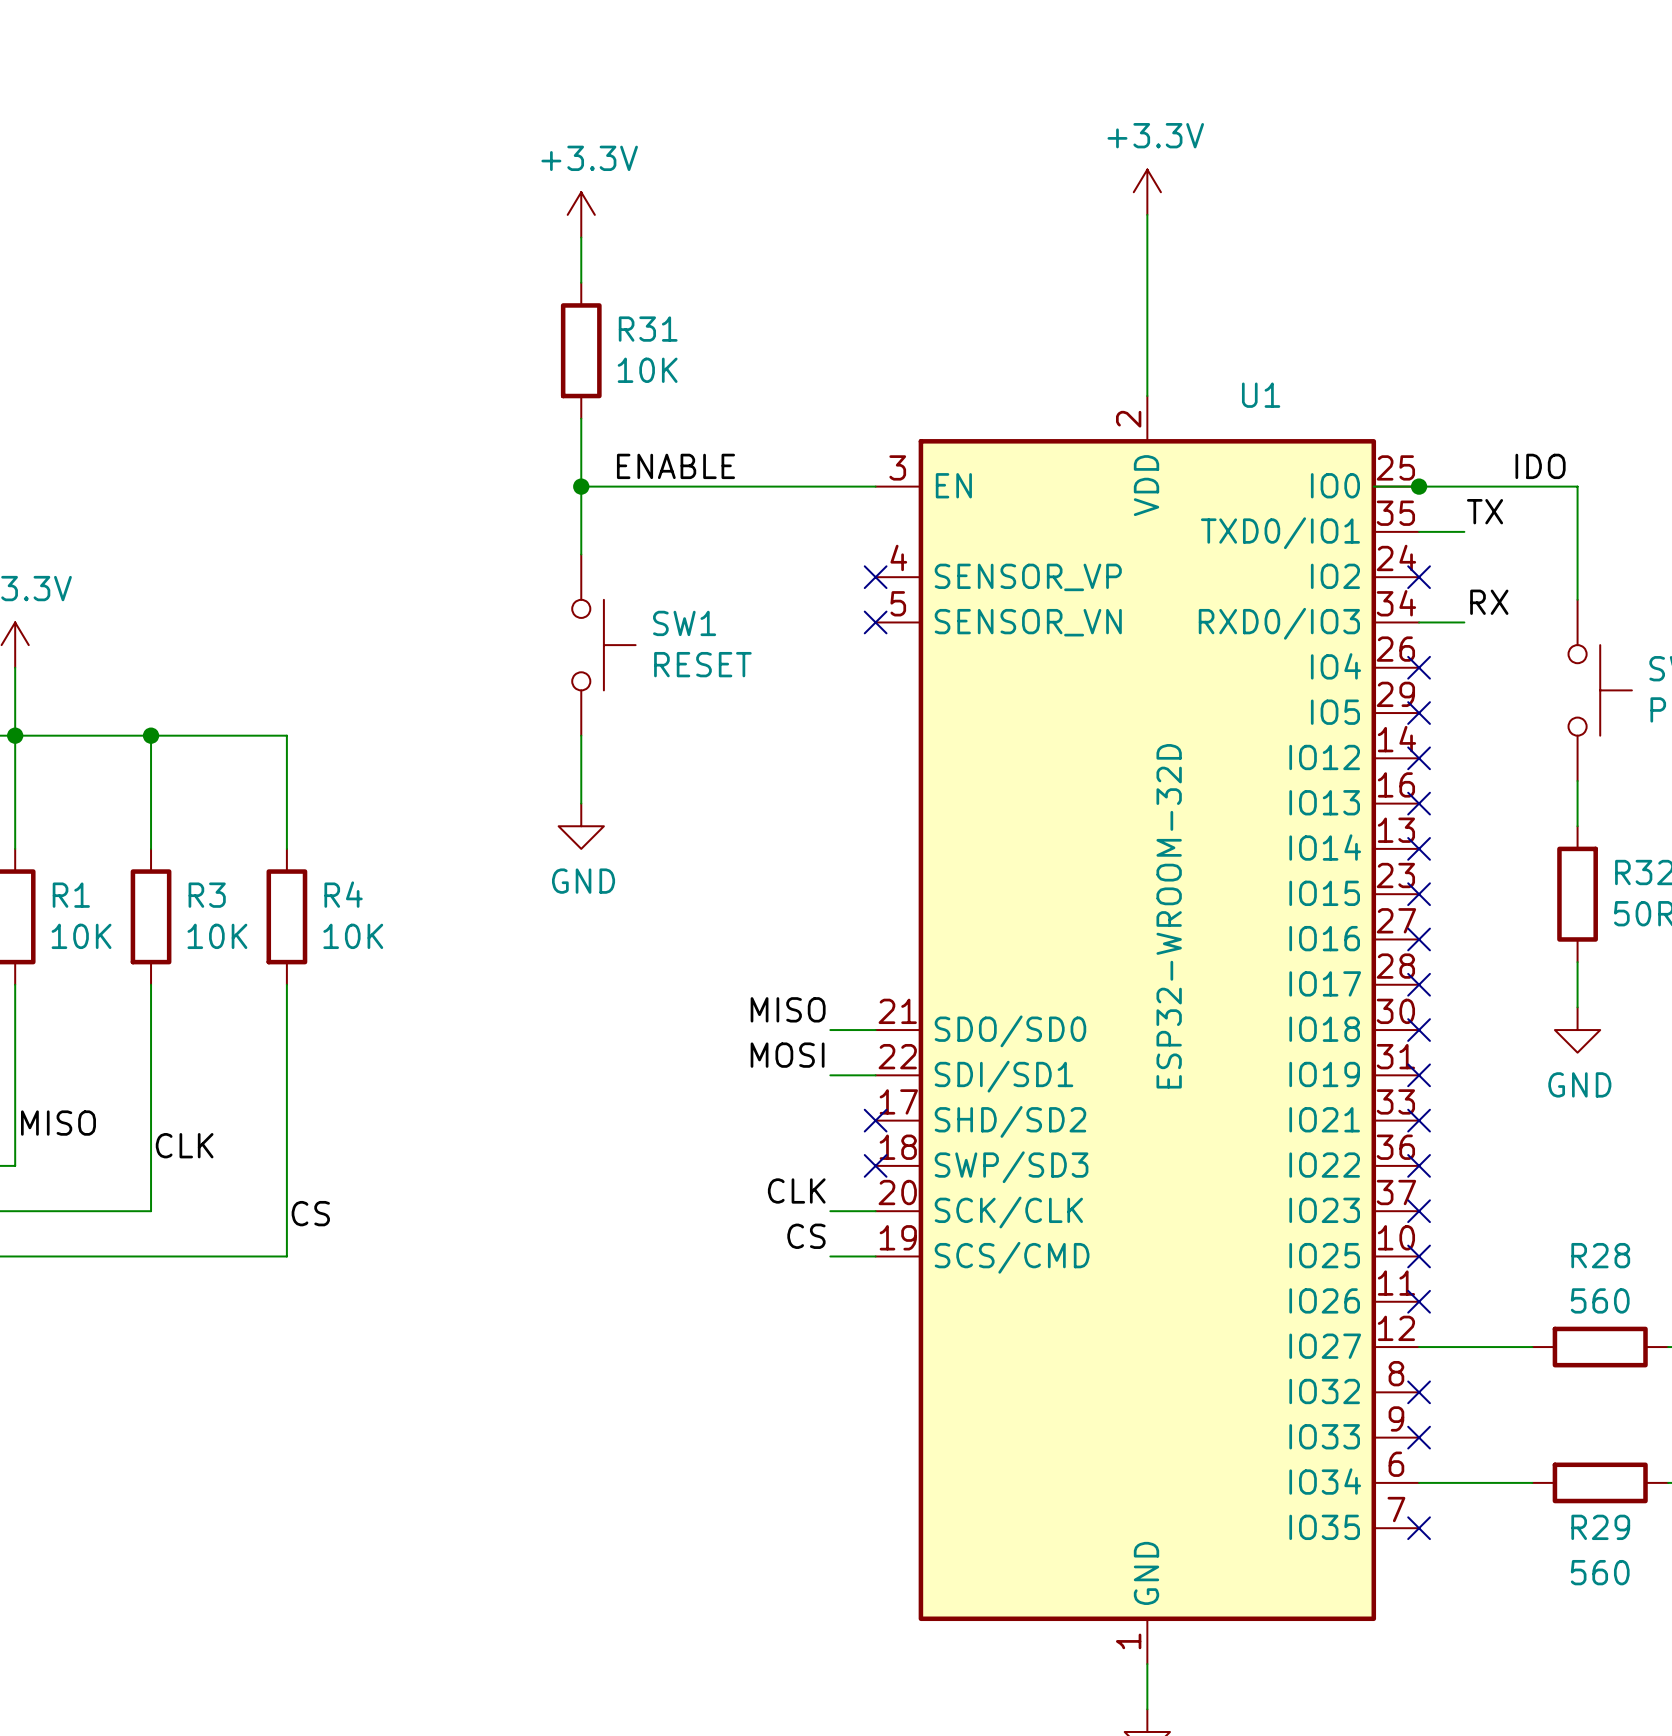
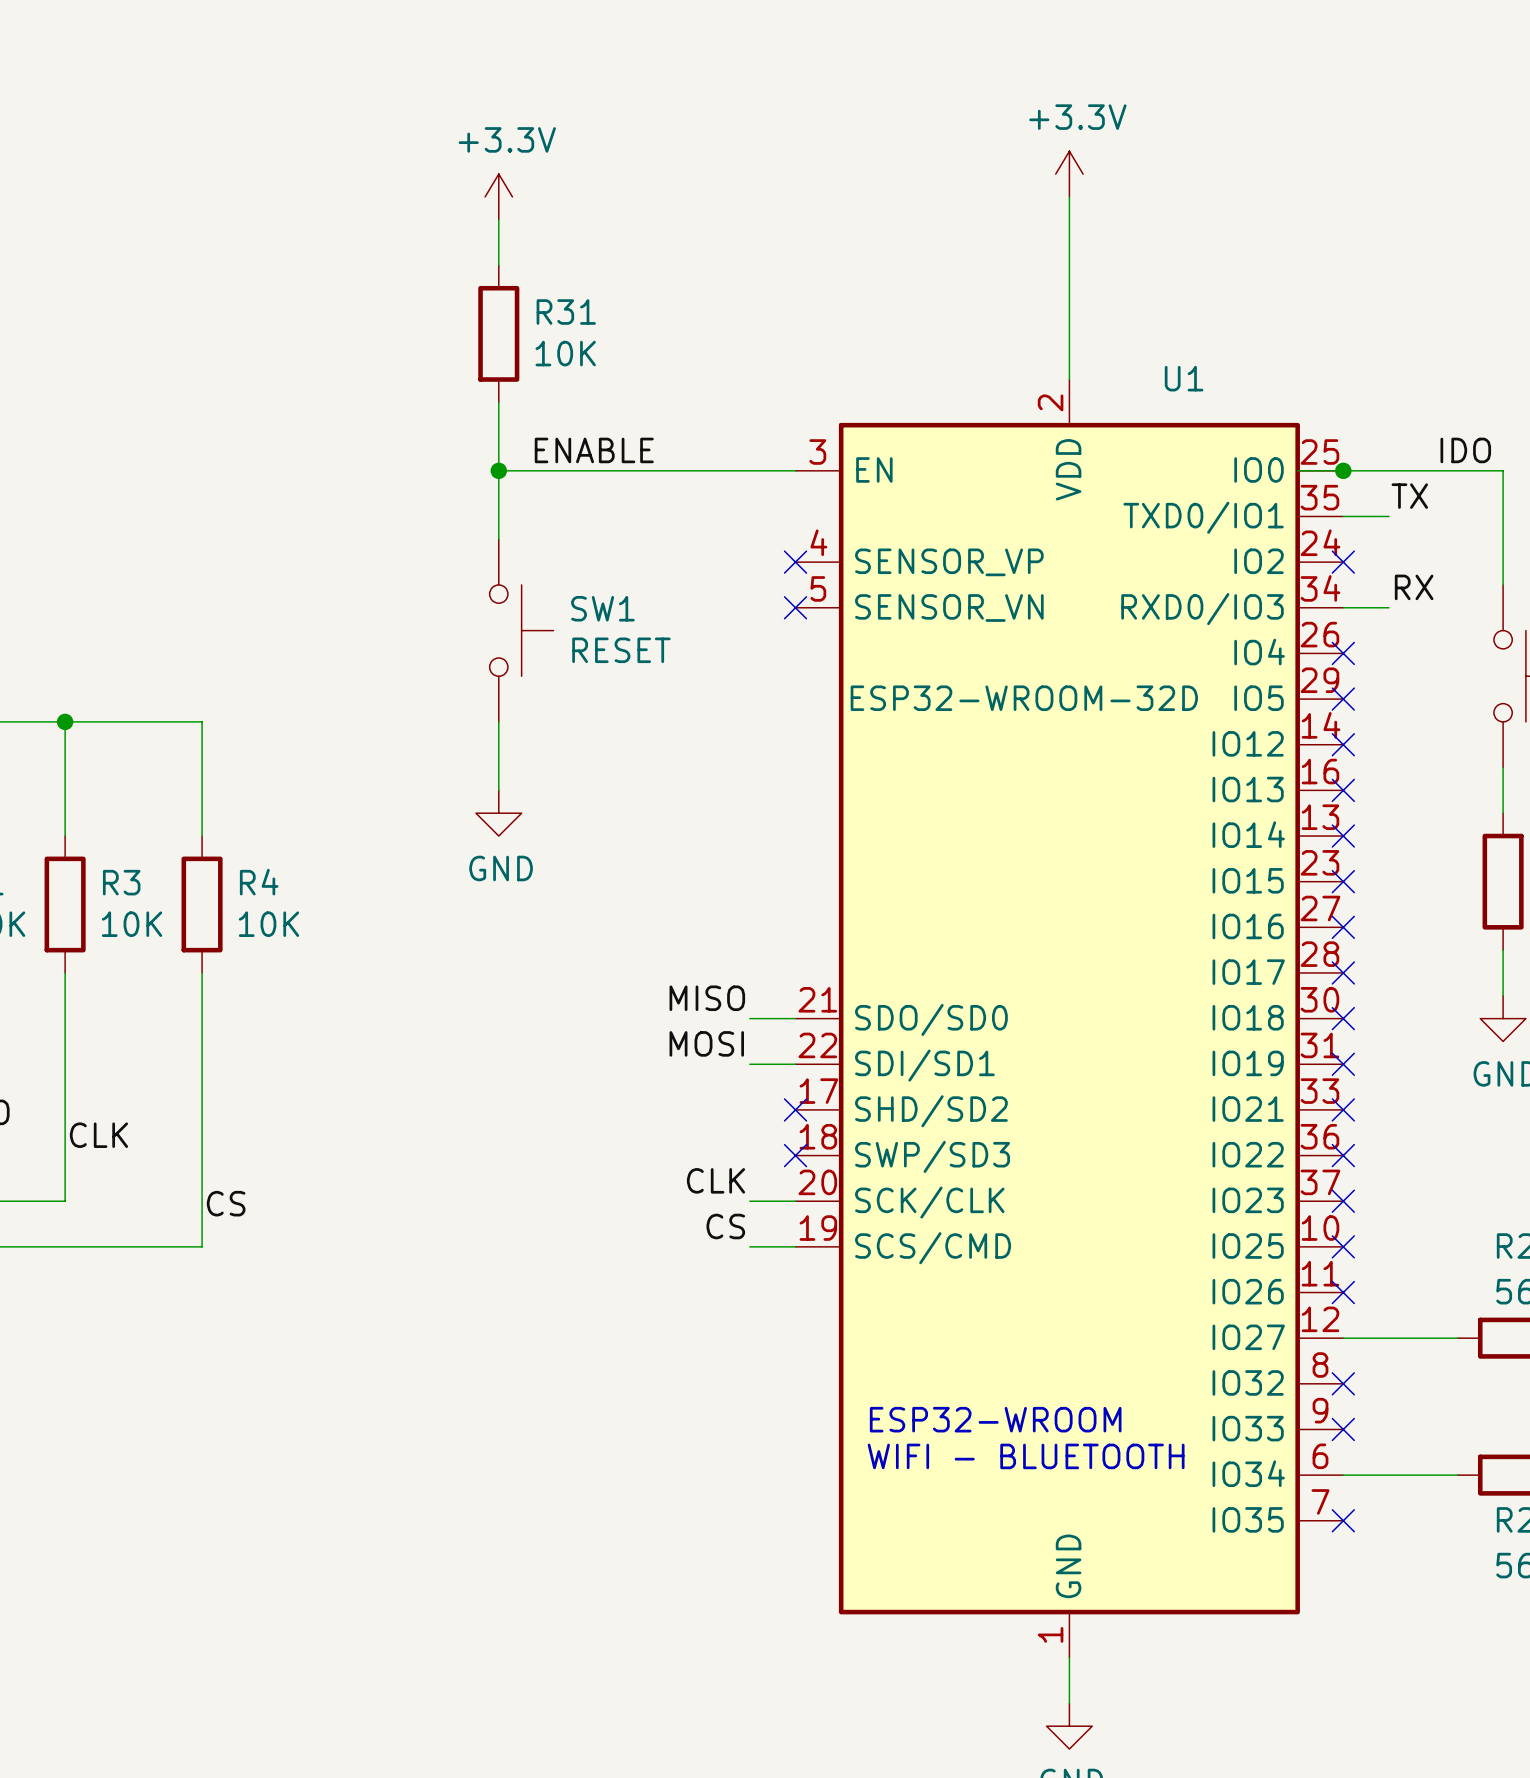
U1 value rotation: 0° (1169, 916) -> 90° clockwise (1024, 698)
text: none -> ESP32-WROOM (995, 1419)
text: none -> WIFI - BLUETOOTH (1026, 1456)

